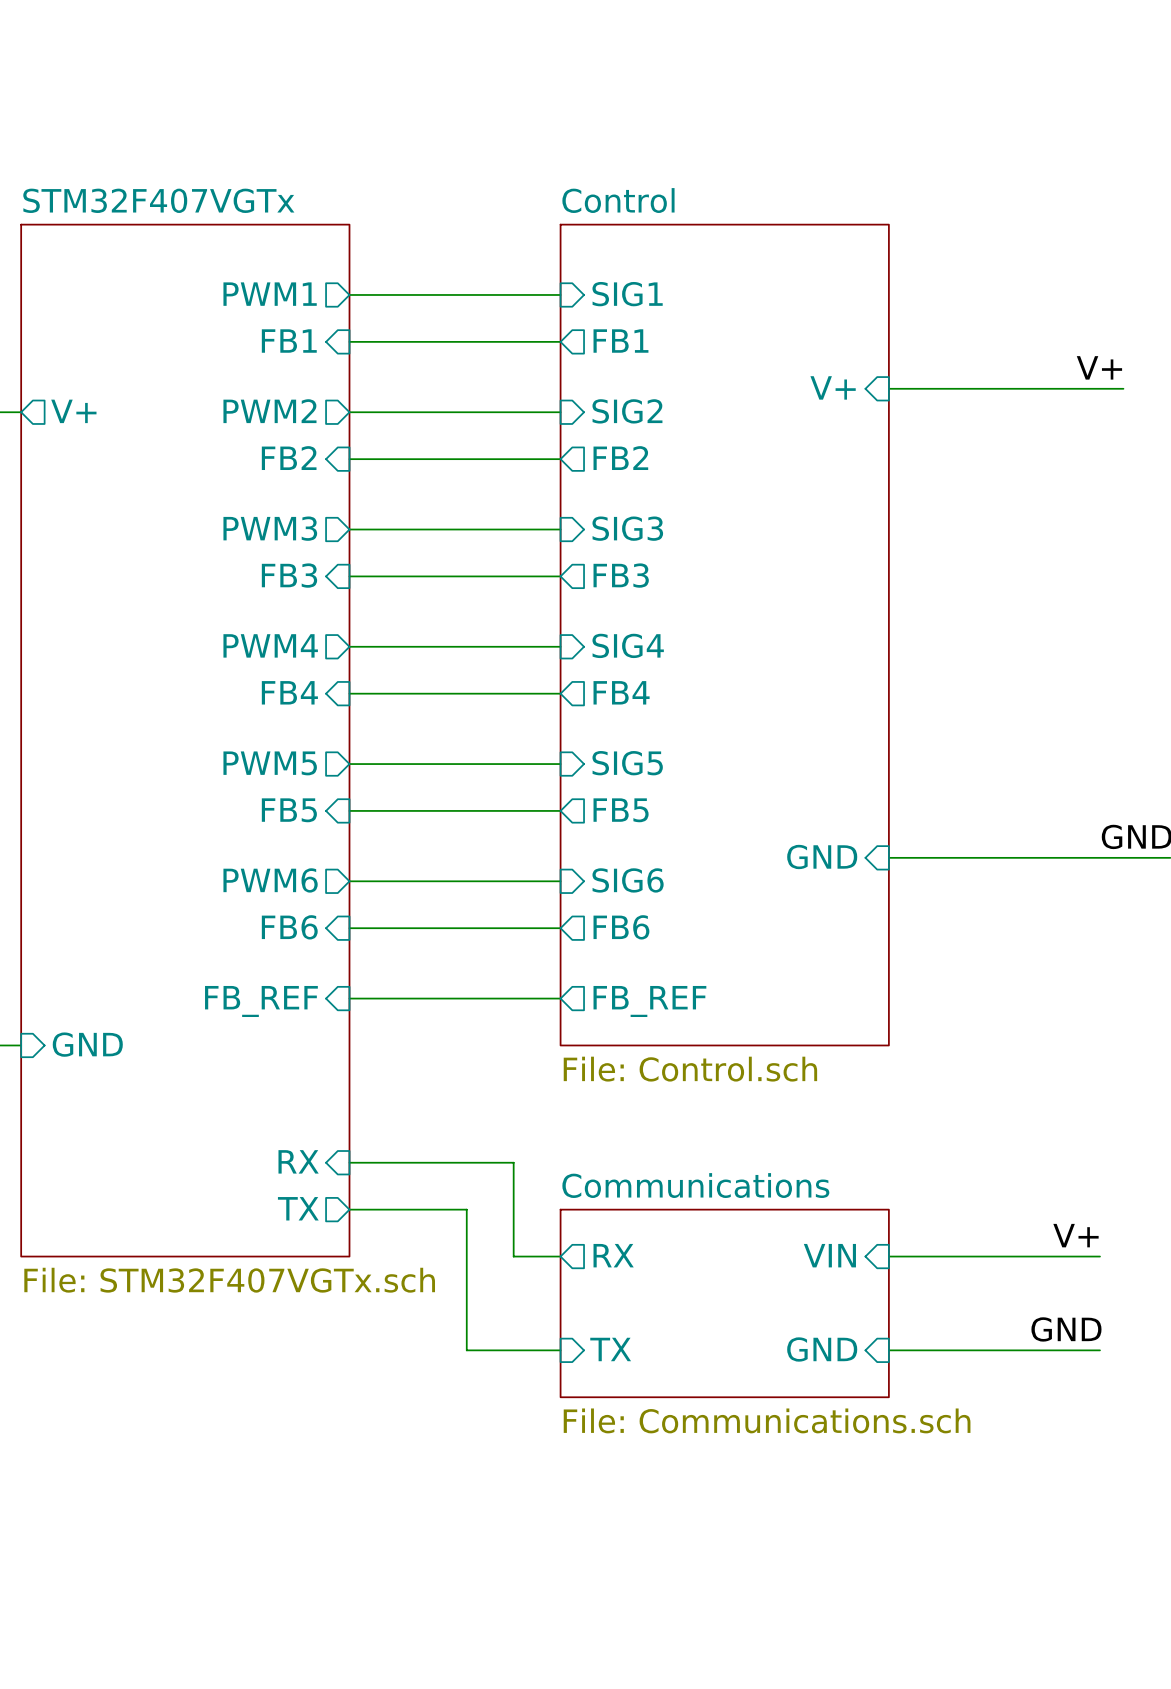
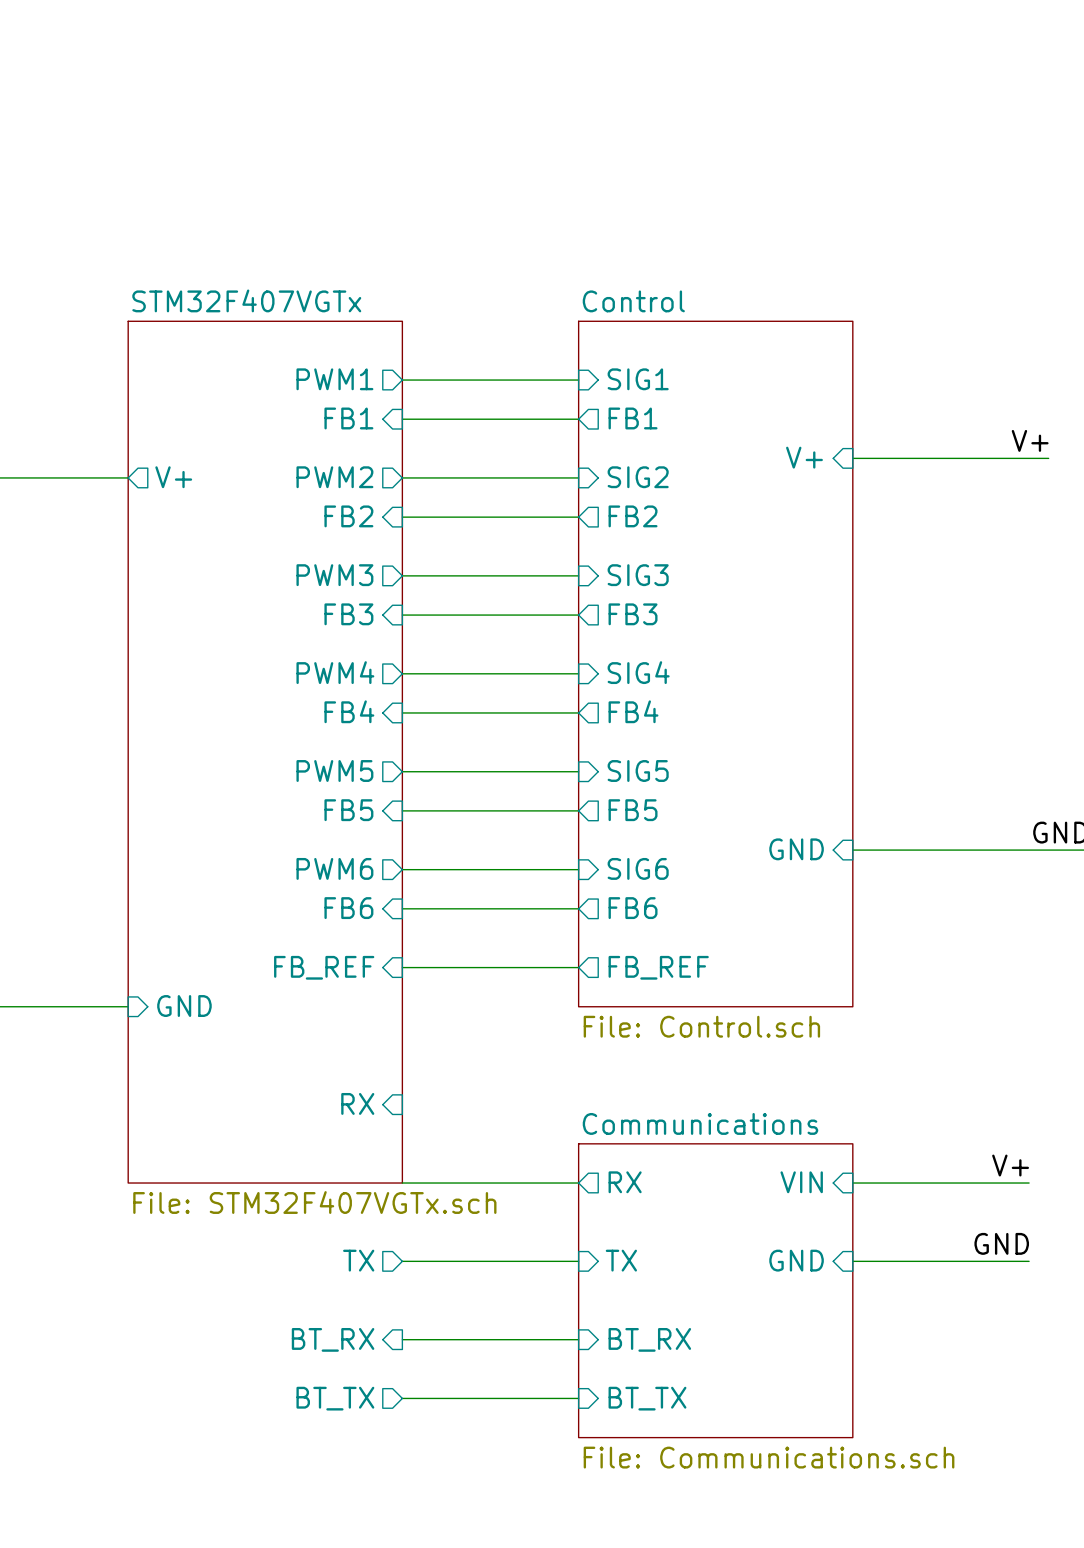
wire: (349, 1162) (513, 1162) (513, 1256) -> (402, 1183) (539, 1183)
sheet pin position: TX (298, 1208) -> TX (358, 1260)
wire: (349, 1209) (466, 1209) (466, 1350) -> (402, 1261) (500, 1261)
sheet Communications: File: Communications.sch (724, 1303) -> none
sheet Communications: none -> File: Communications.sch (715, 1290)
wire: none -> (402, 1339) (578, 1339)
sheet pin: none -> BT_RX (333, 1339)
sheet pin: none -> BT_RX (649, 1339)
wire: none -> (402, 1398) (578, 1398)
sheet pin: none -> BT_TX (335, 1398)
sheet pin: none -> BT_TX (647, 1398)

